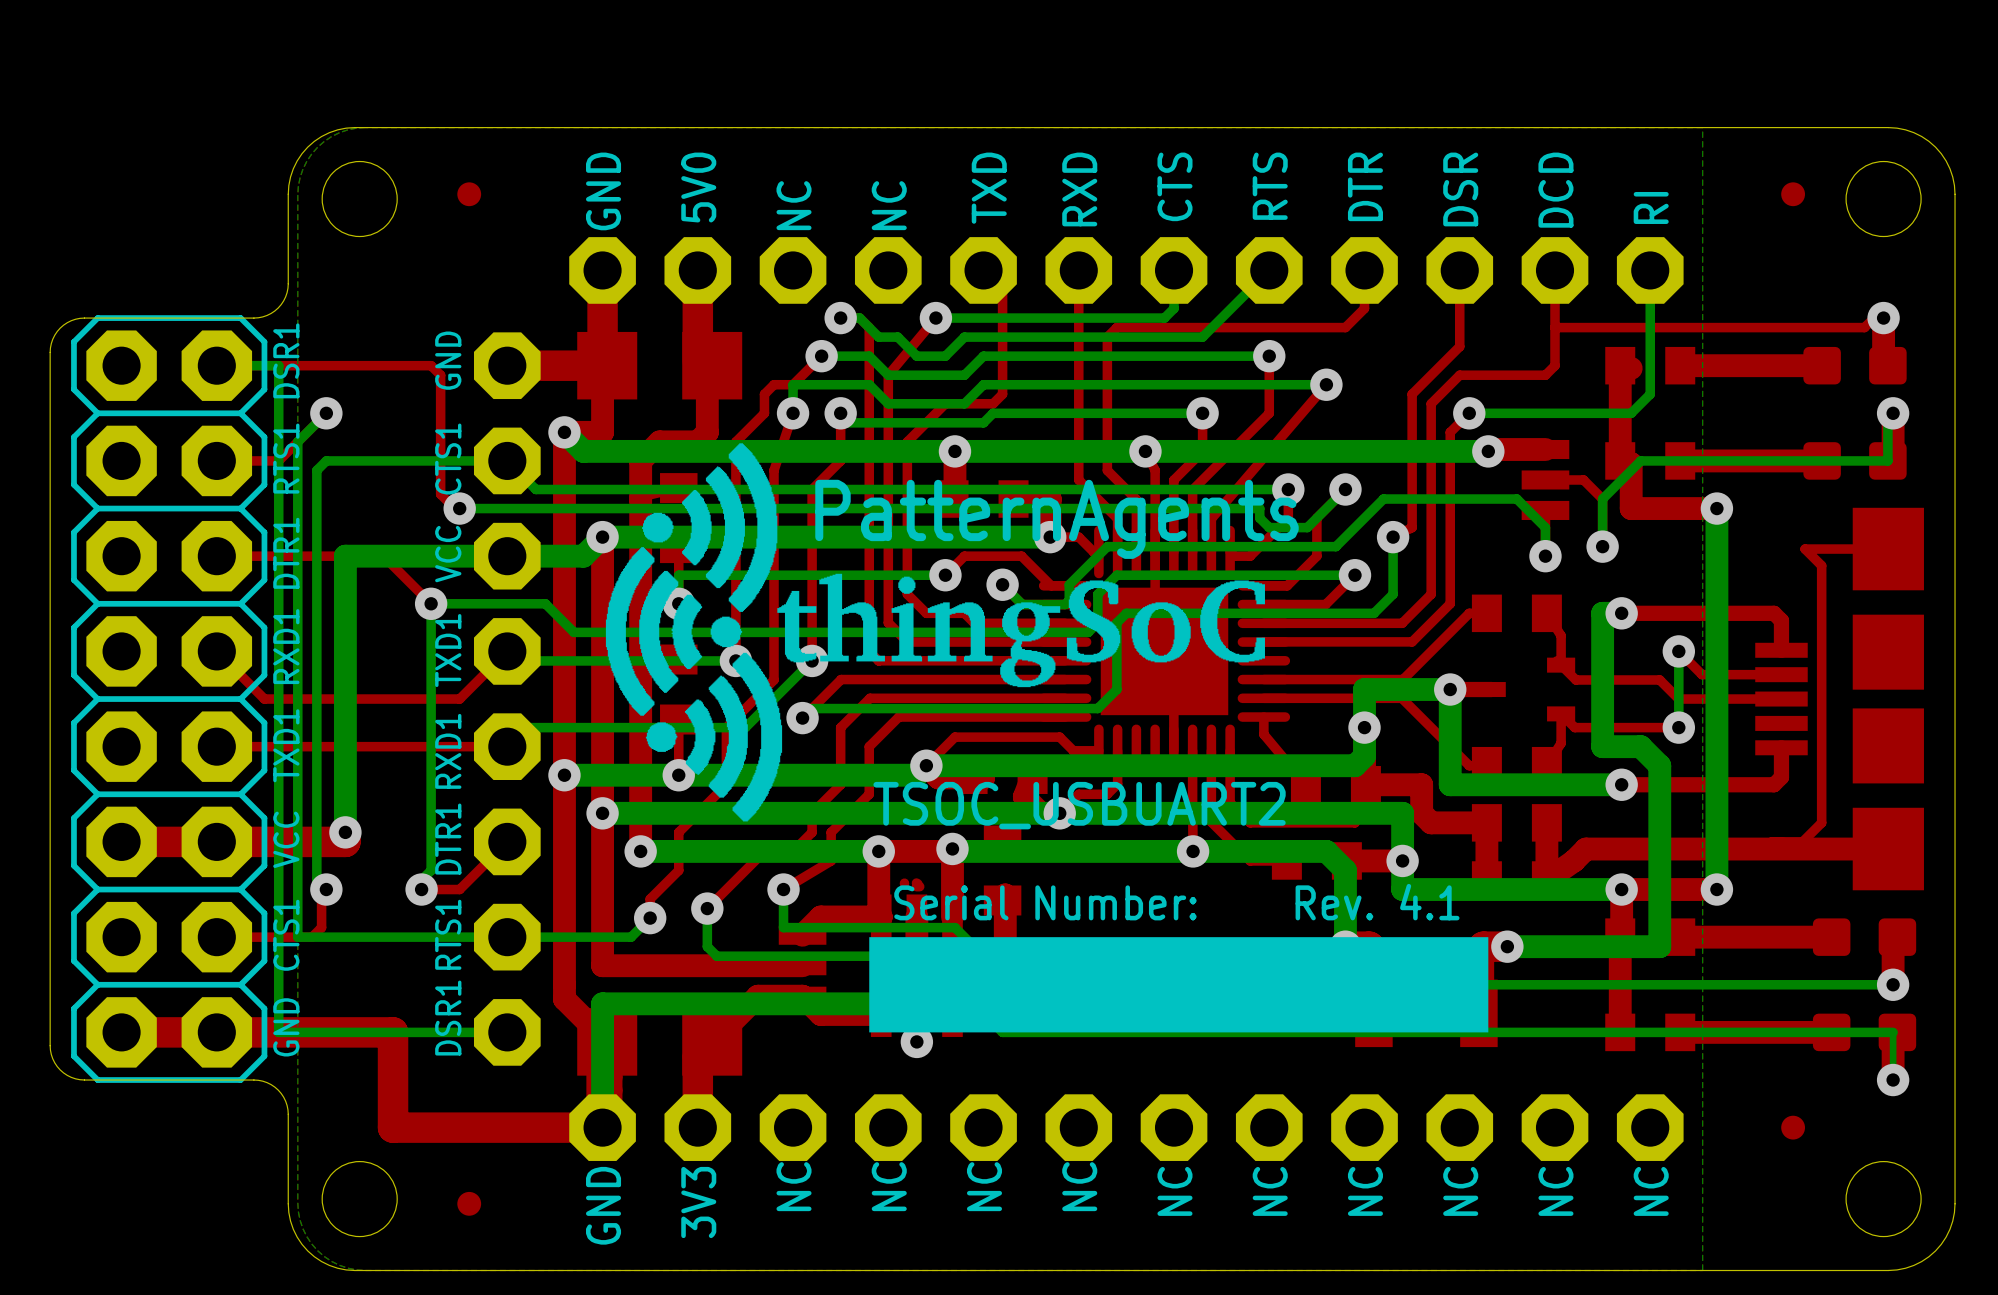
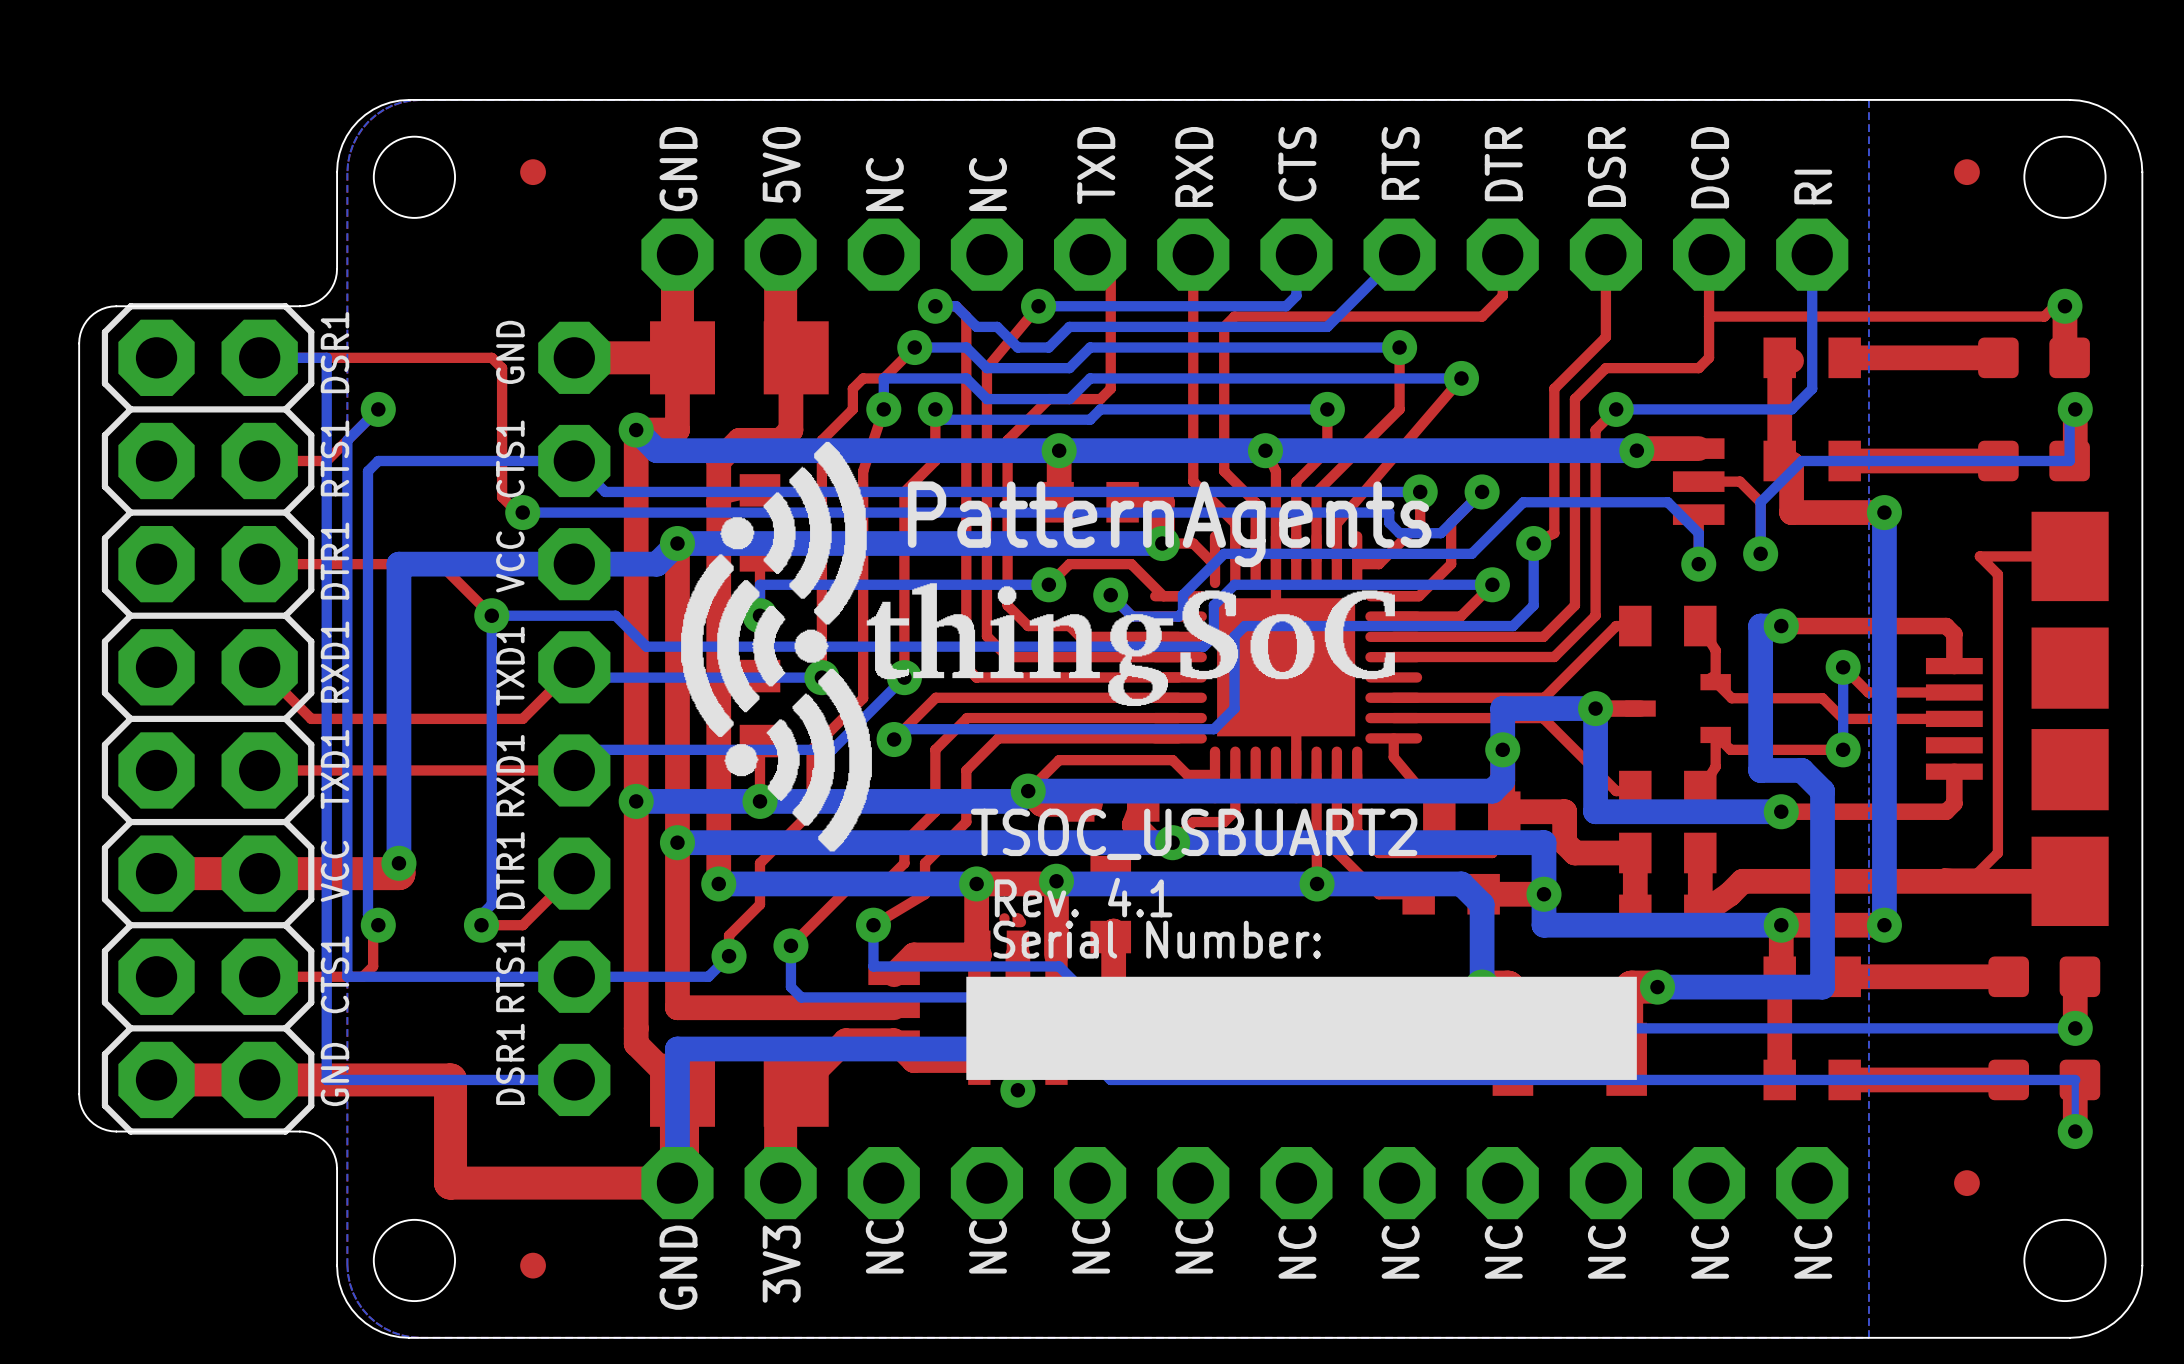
text position: Rev. 4.1 (1377, 902) -> Rev. 4.1 (1083, 897)

